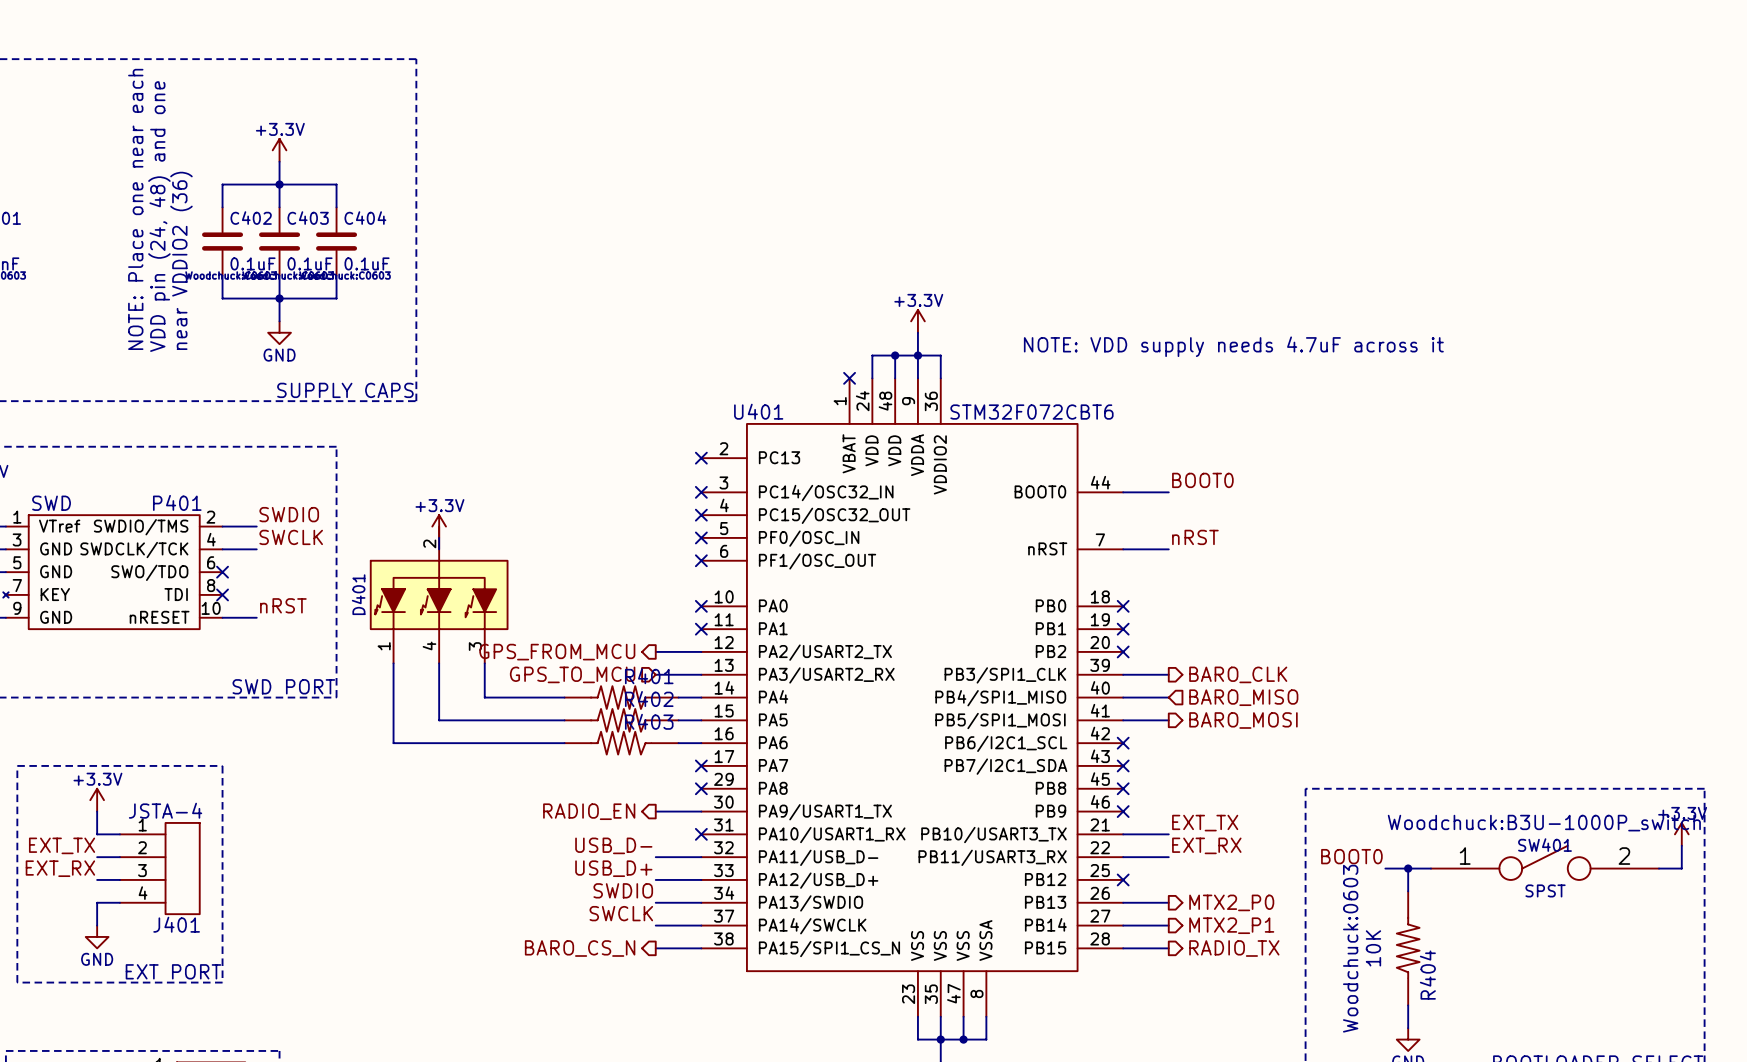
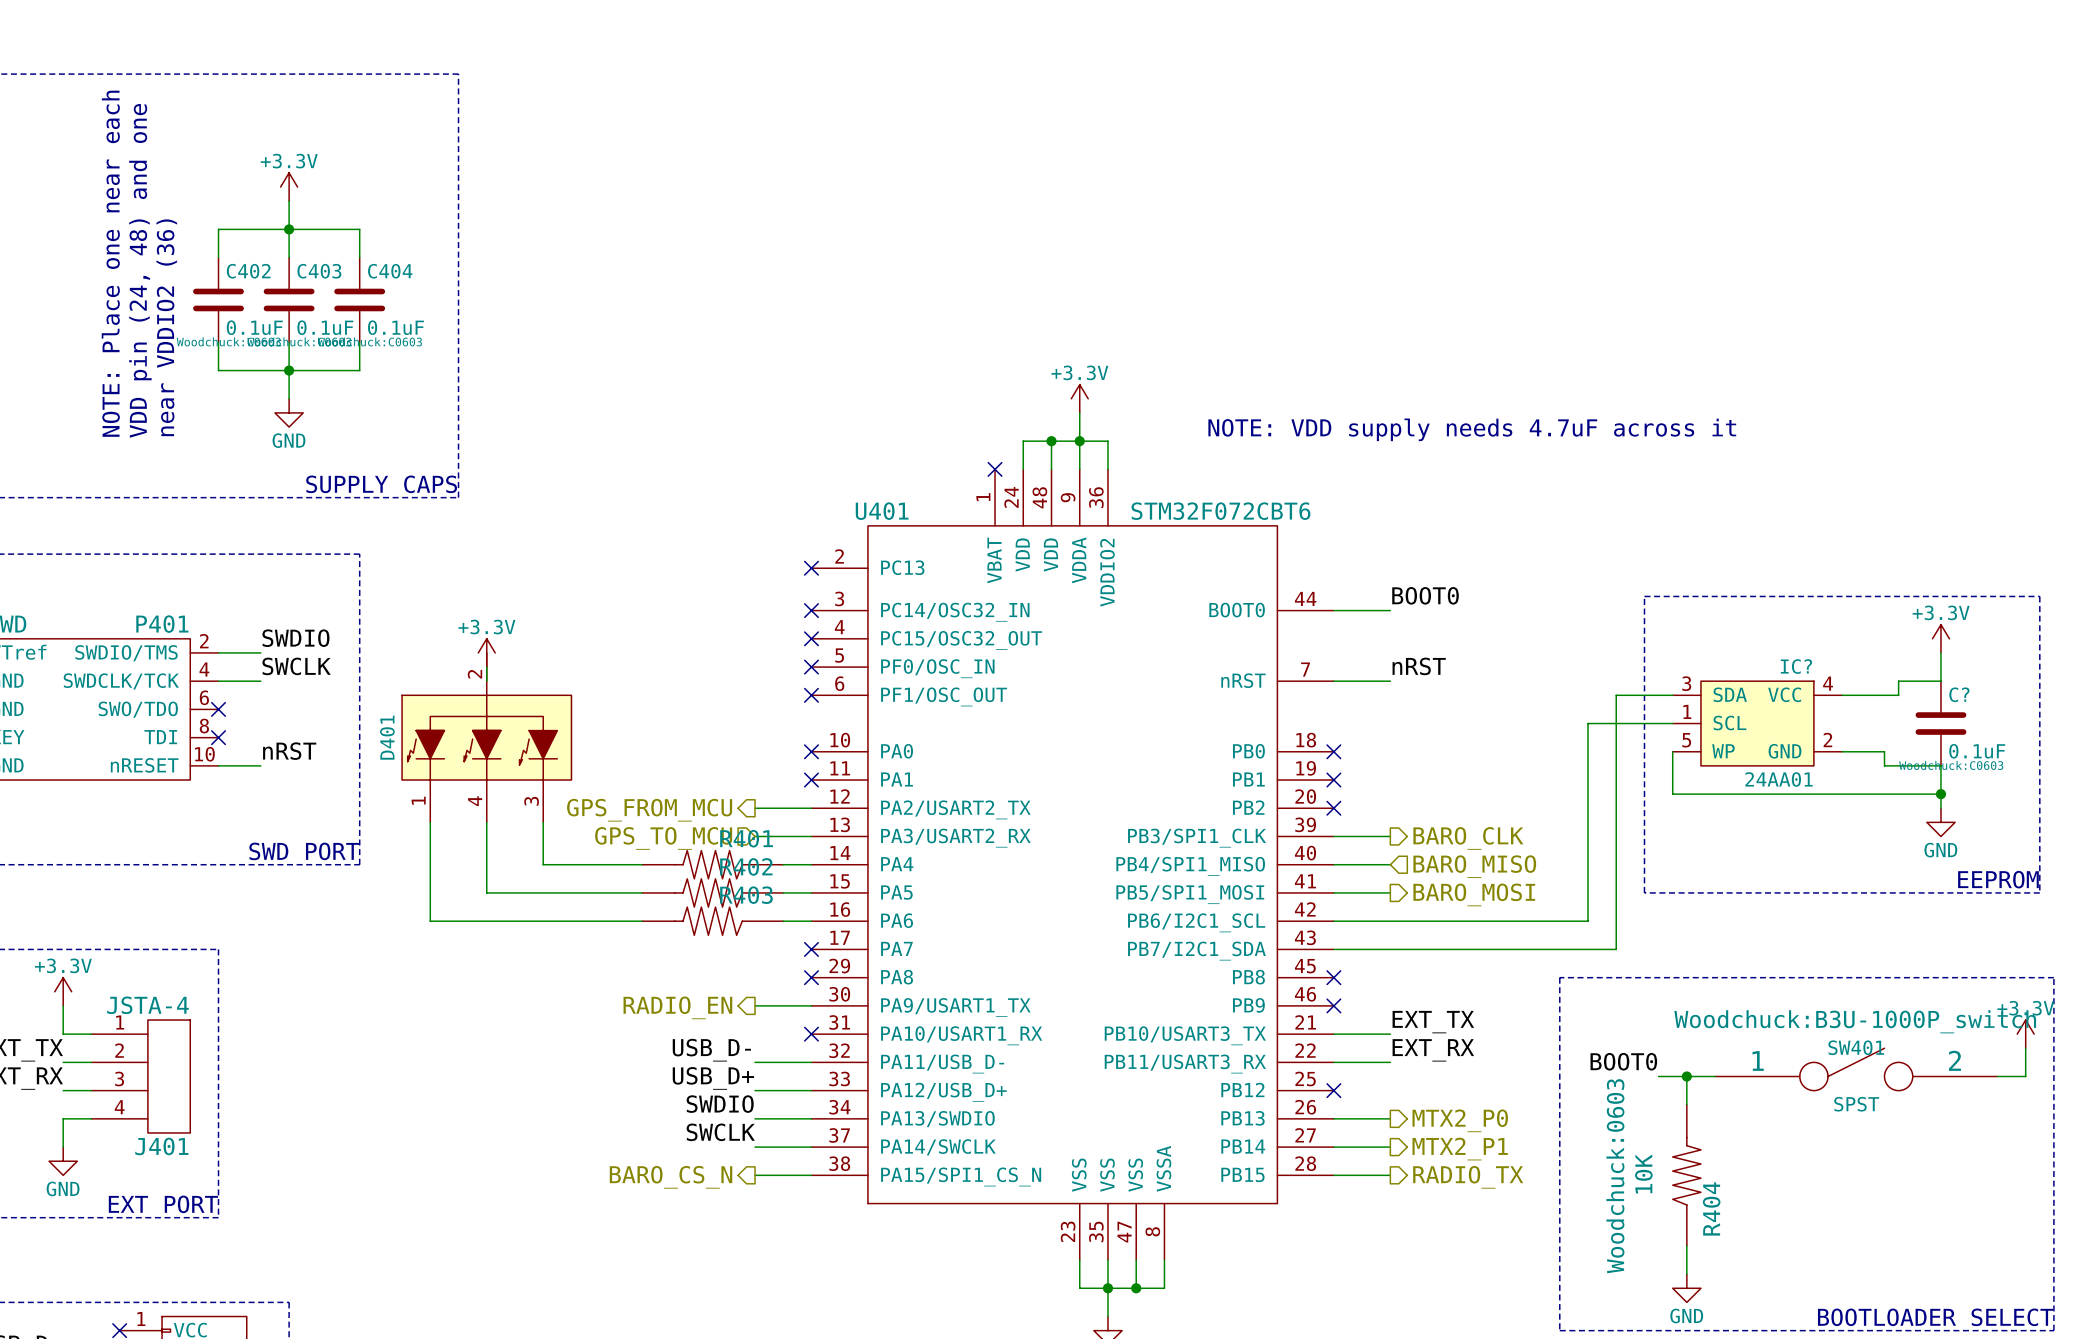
line: none -> (1644, 596) (2039, 596) (2039, 892) (1644, 892) (1644, 596)
power symbol: none -> +3.3V (1940, 638)
wire: none -> (1940, 652) (1940, 681) (1898, 681) (1898, 695) (1842, 695)
wire: none -> (1672, 695) (1616, 695) (1616, 949) (1333, 949)
wire: none -> (1672, 723) (1588, 723) (1588, 921) (1333, 921)
IC?: none -> 24AA01 (1757, 723)
C?: none -> 0.1uF (1940, 723)
wire: none -> (1672, 751) (1672, 794) (1940, 794)
wire: none -> (1842, 751) (1884, 751) (1884, 765) (1940, 765) (1940, 808)
junction: none -> (1940, 794)
power symbol: none -> GND (1940, 822)
text: none -> EEPROM (1998, 879)
no-connect mark: (1123, 743) -> none
no-connect mark: (1123, 765) -> none

